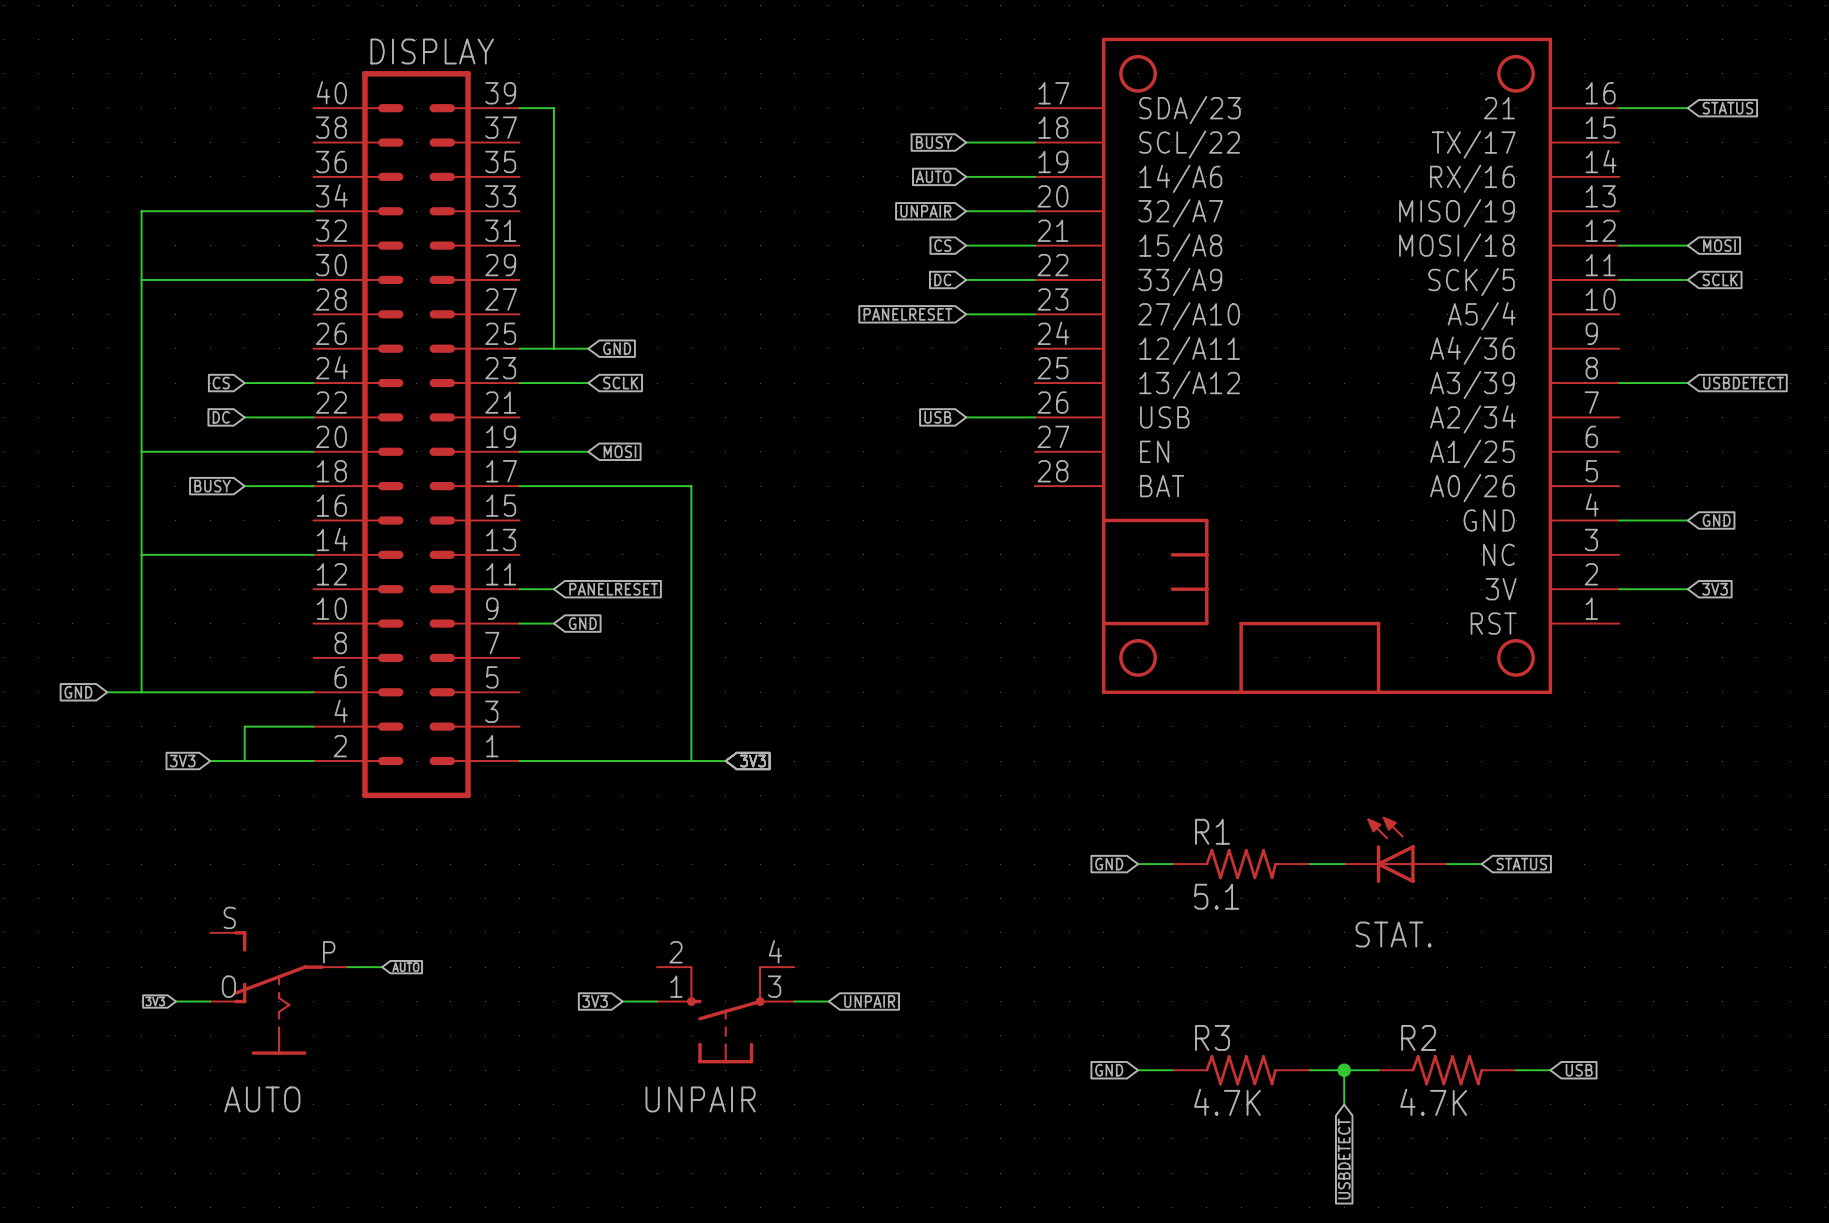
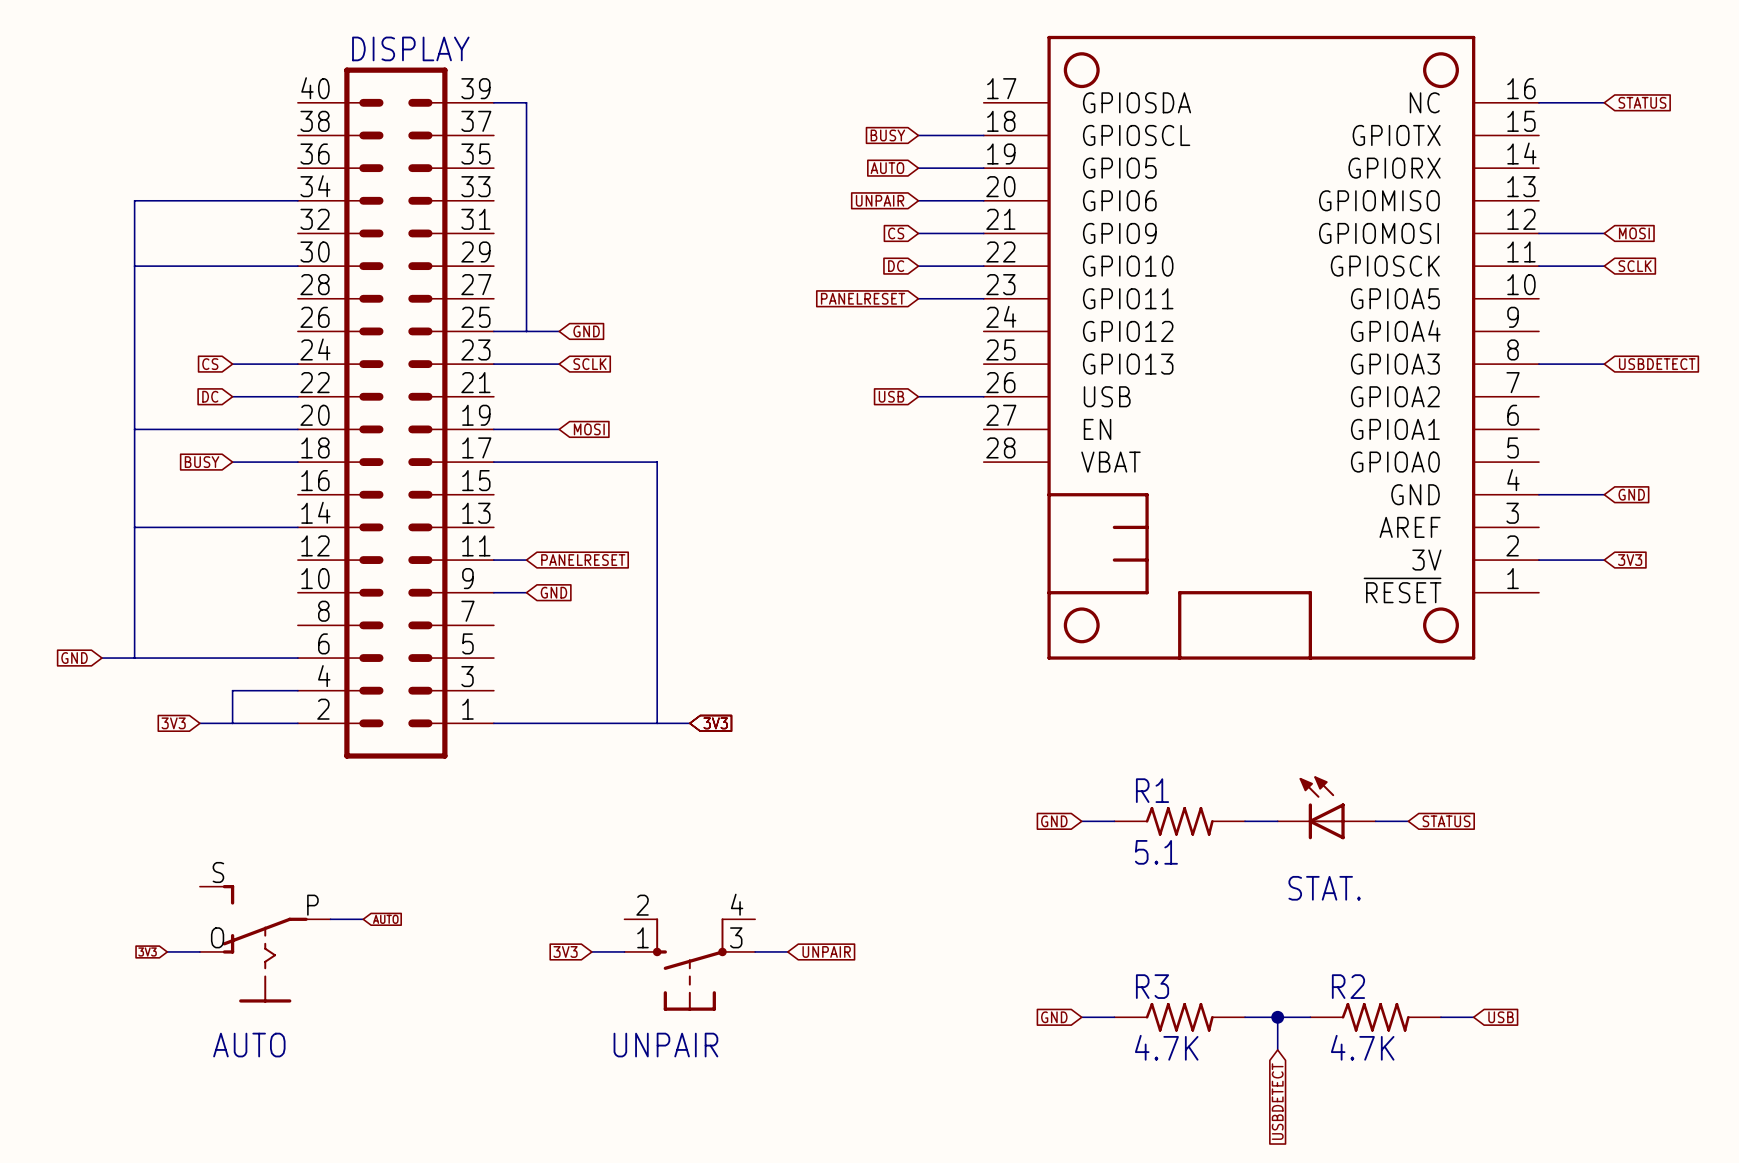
part symbol: [1034, 37, 1620, 695] -> [983, 35, 1539, 660]

